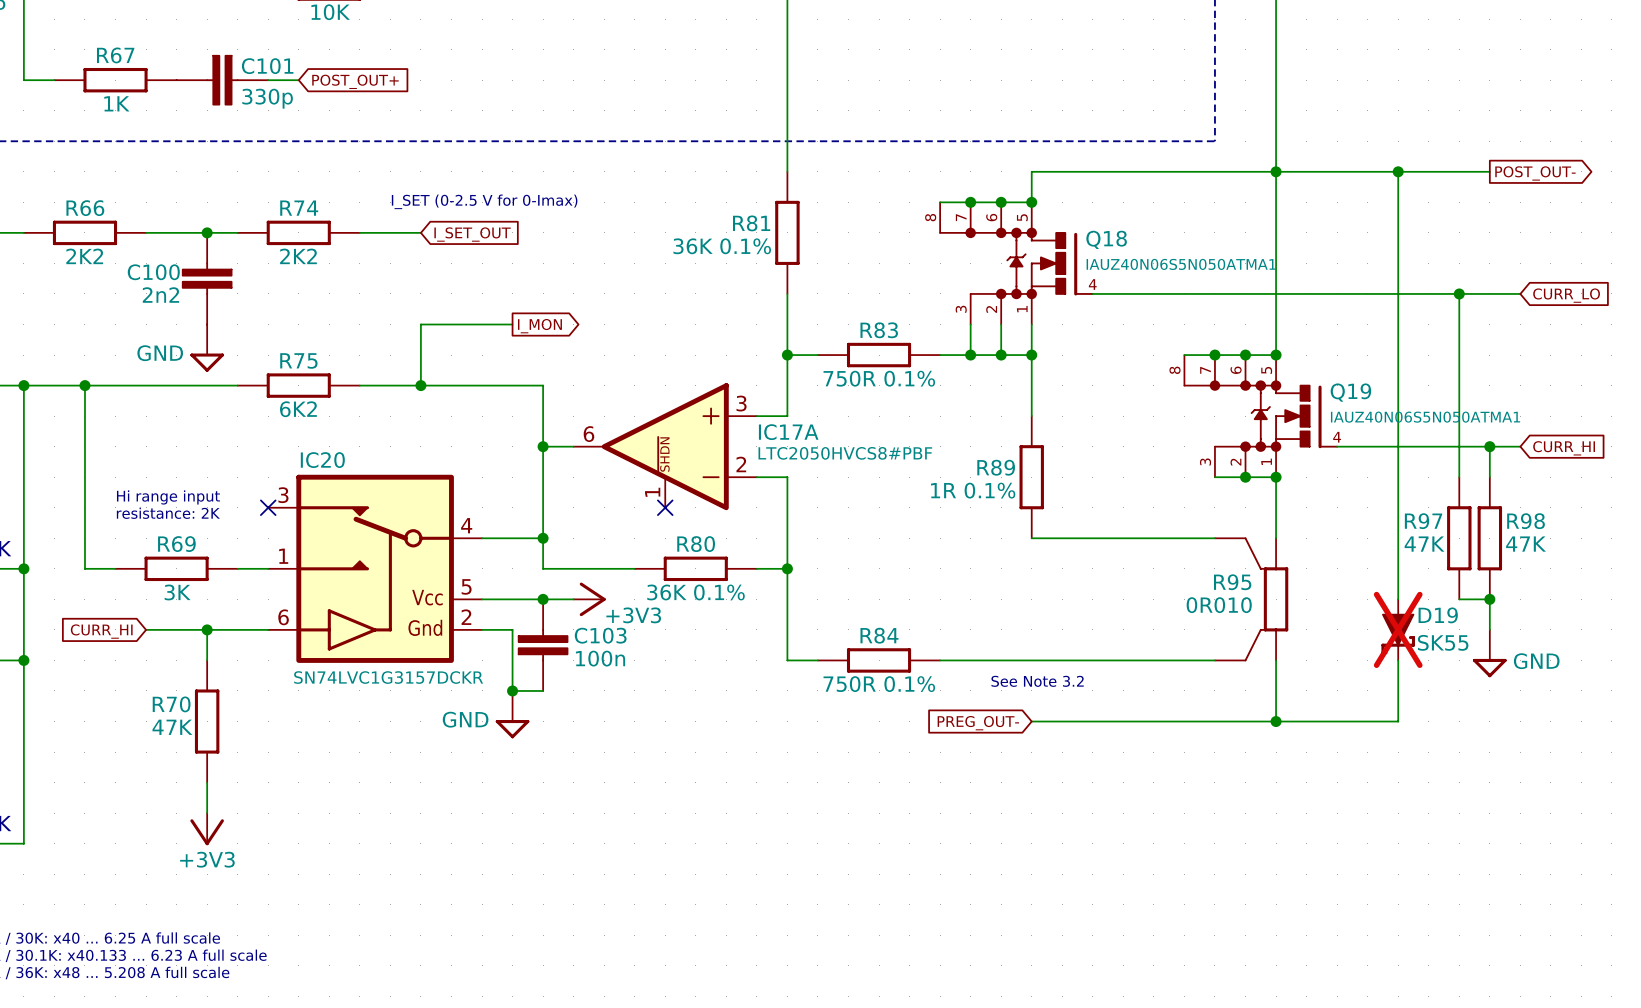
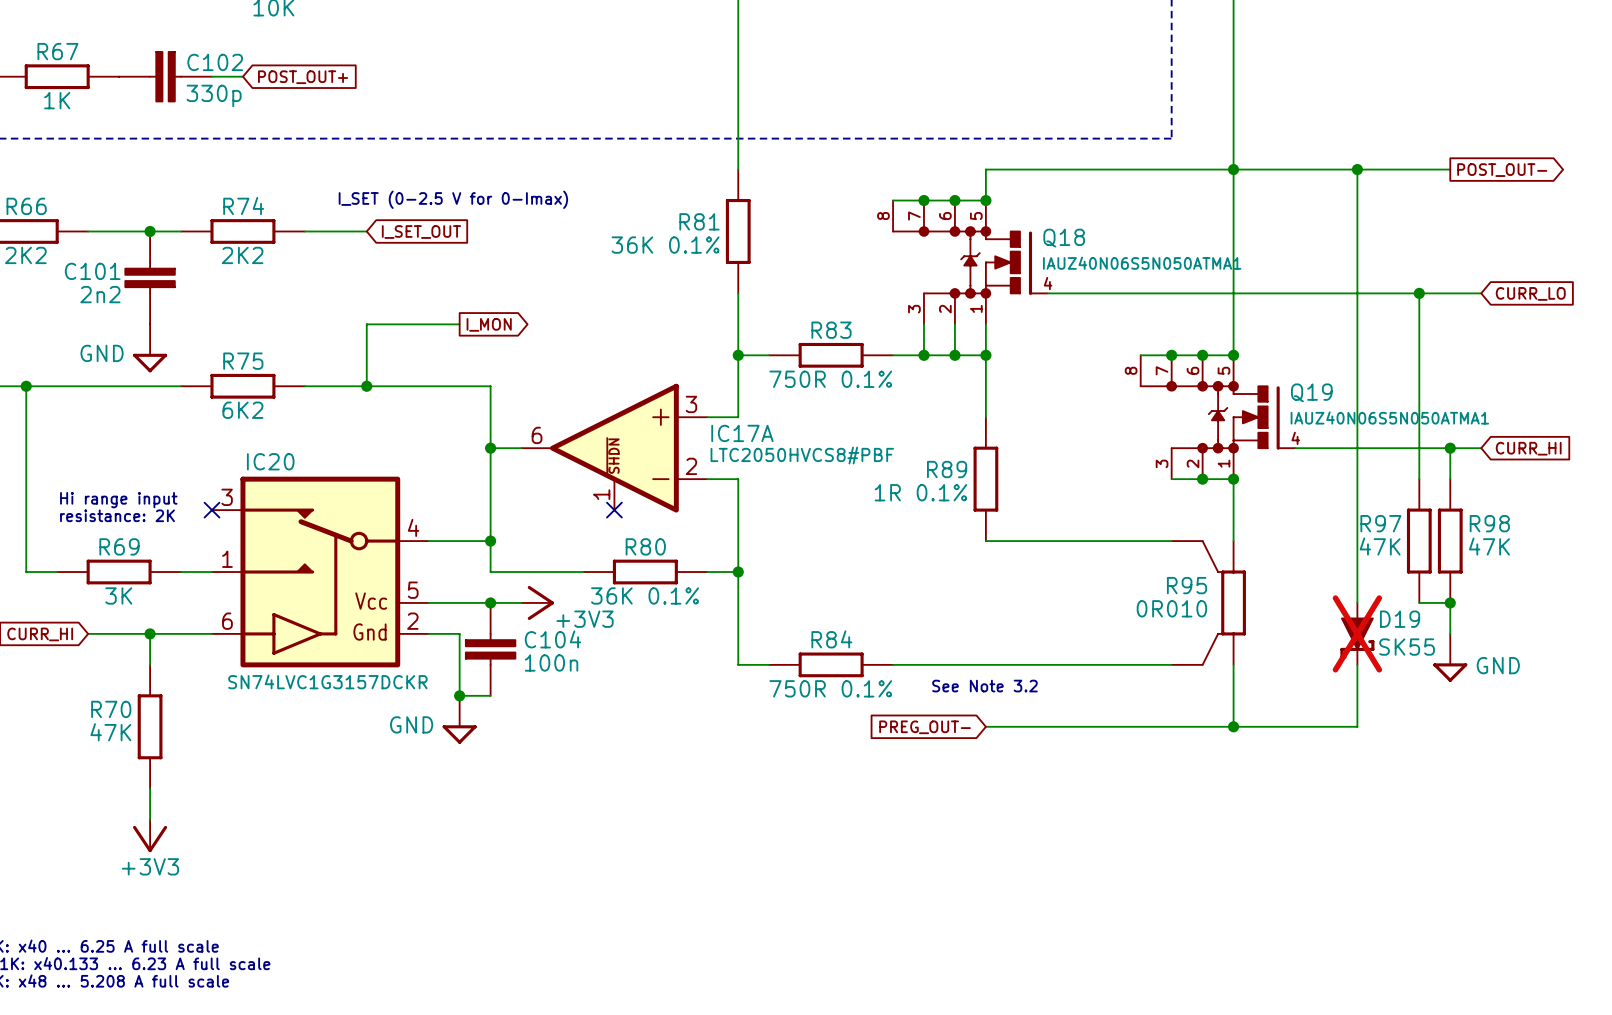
C101 name: C101 (267, 66) -> C102 (215, 62)
C100 name: C100 (153, 272) -> C101 (92, 271)
C103 name: C103 (600, 635) -> C104 (553, 639)

